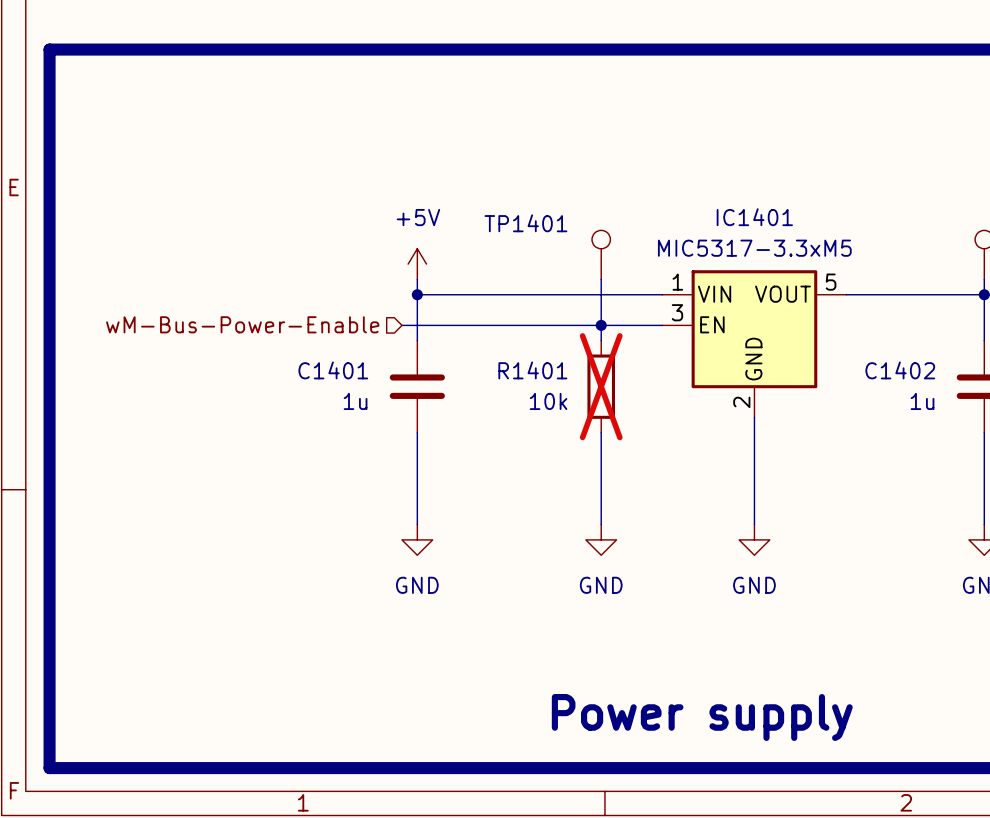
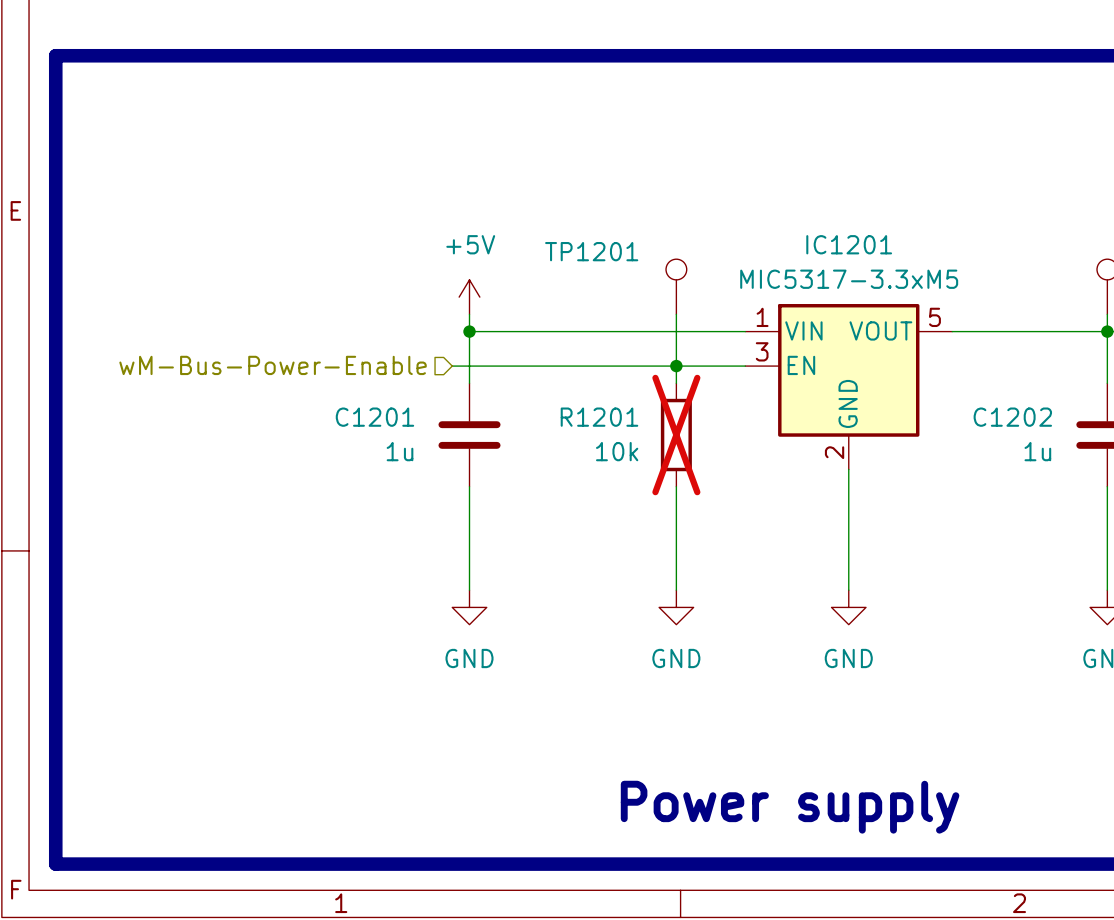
IC1401 name: IC1401 (754, 217) -> IC1201 (849, 244)
TP1401 name: TP1401 (525, 223) -> TP1201 (591, 251)
C1401 name: C1401 (333, 370) -> C1201 (374, 417)
R1401 name: R1401 (532, 370) -> R1201 (599, 417)
C1402 name: C1402 (900, 370) -> C1202 (1012, 417)

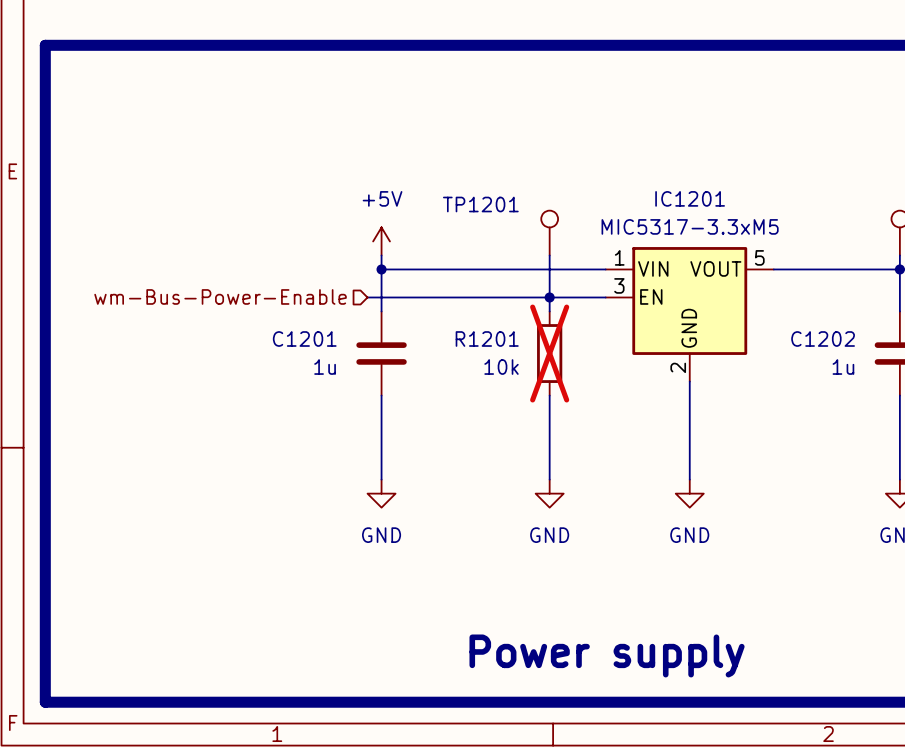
hierarchical label: wM-Bus-Power-Enable (273, 365) -> wm-Bus-Power-Enable (220, 296)
text position: Power supply (790, 807) -> Power supply (607, 655)

